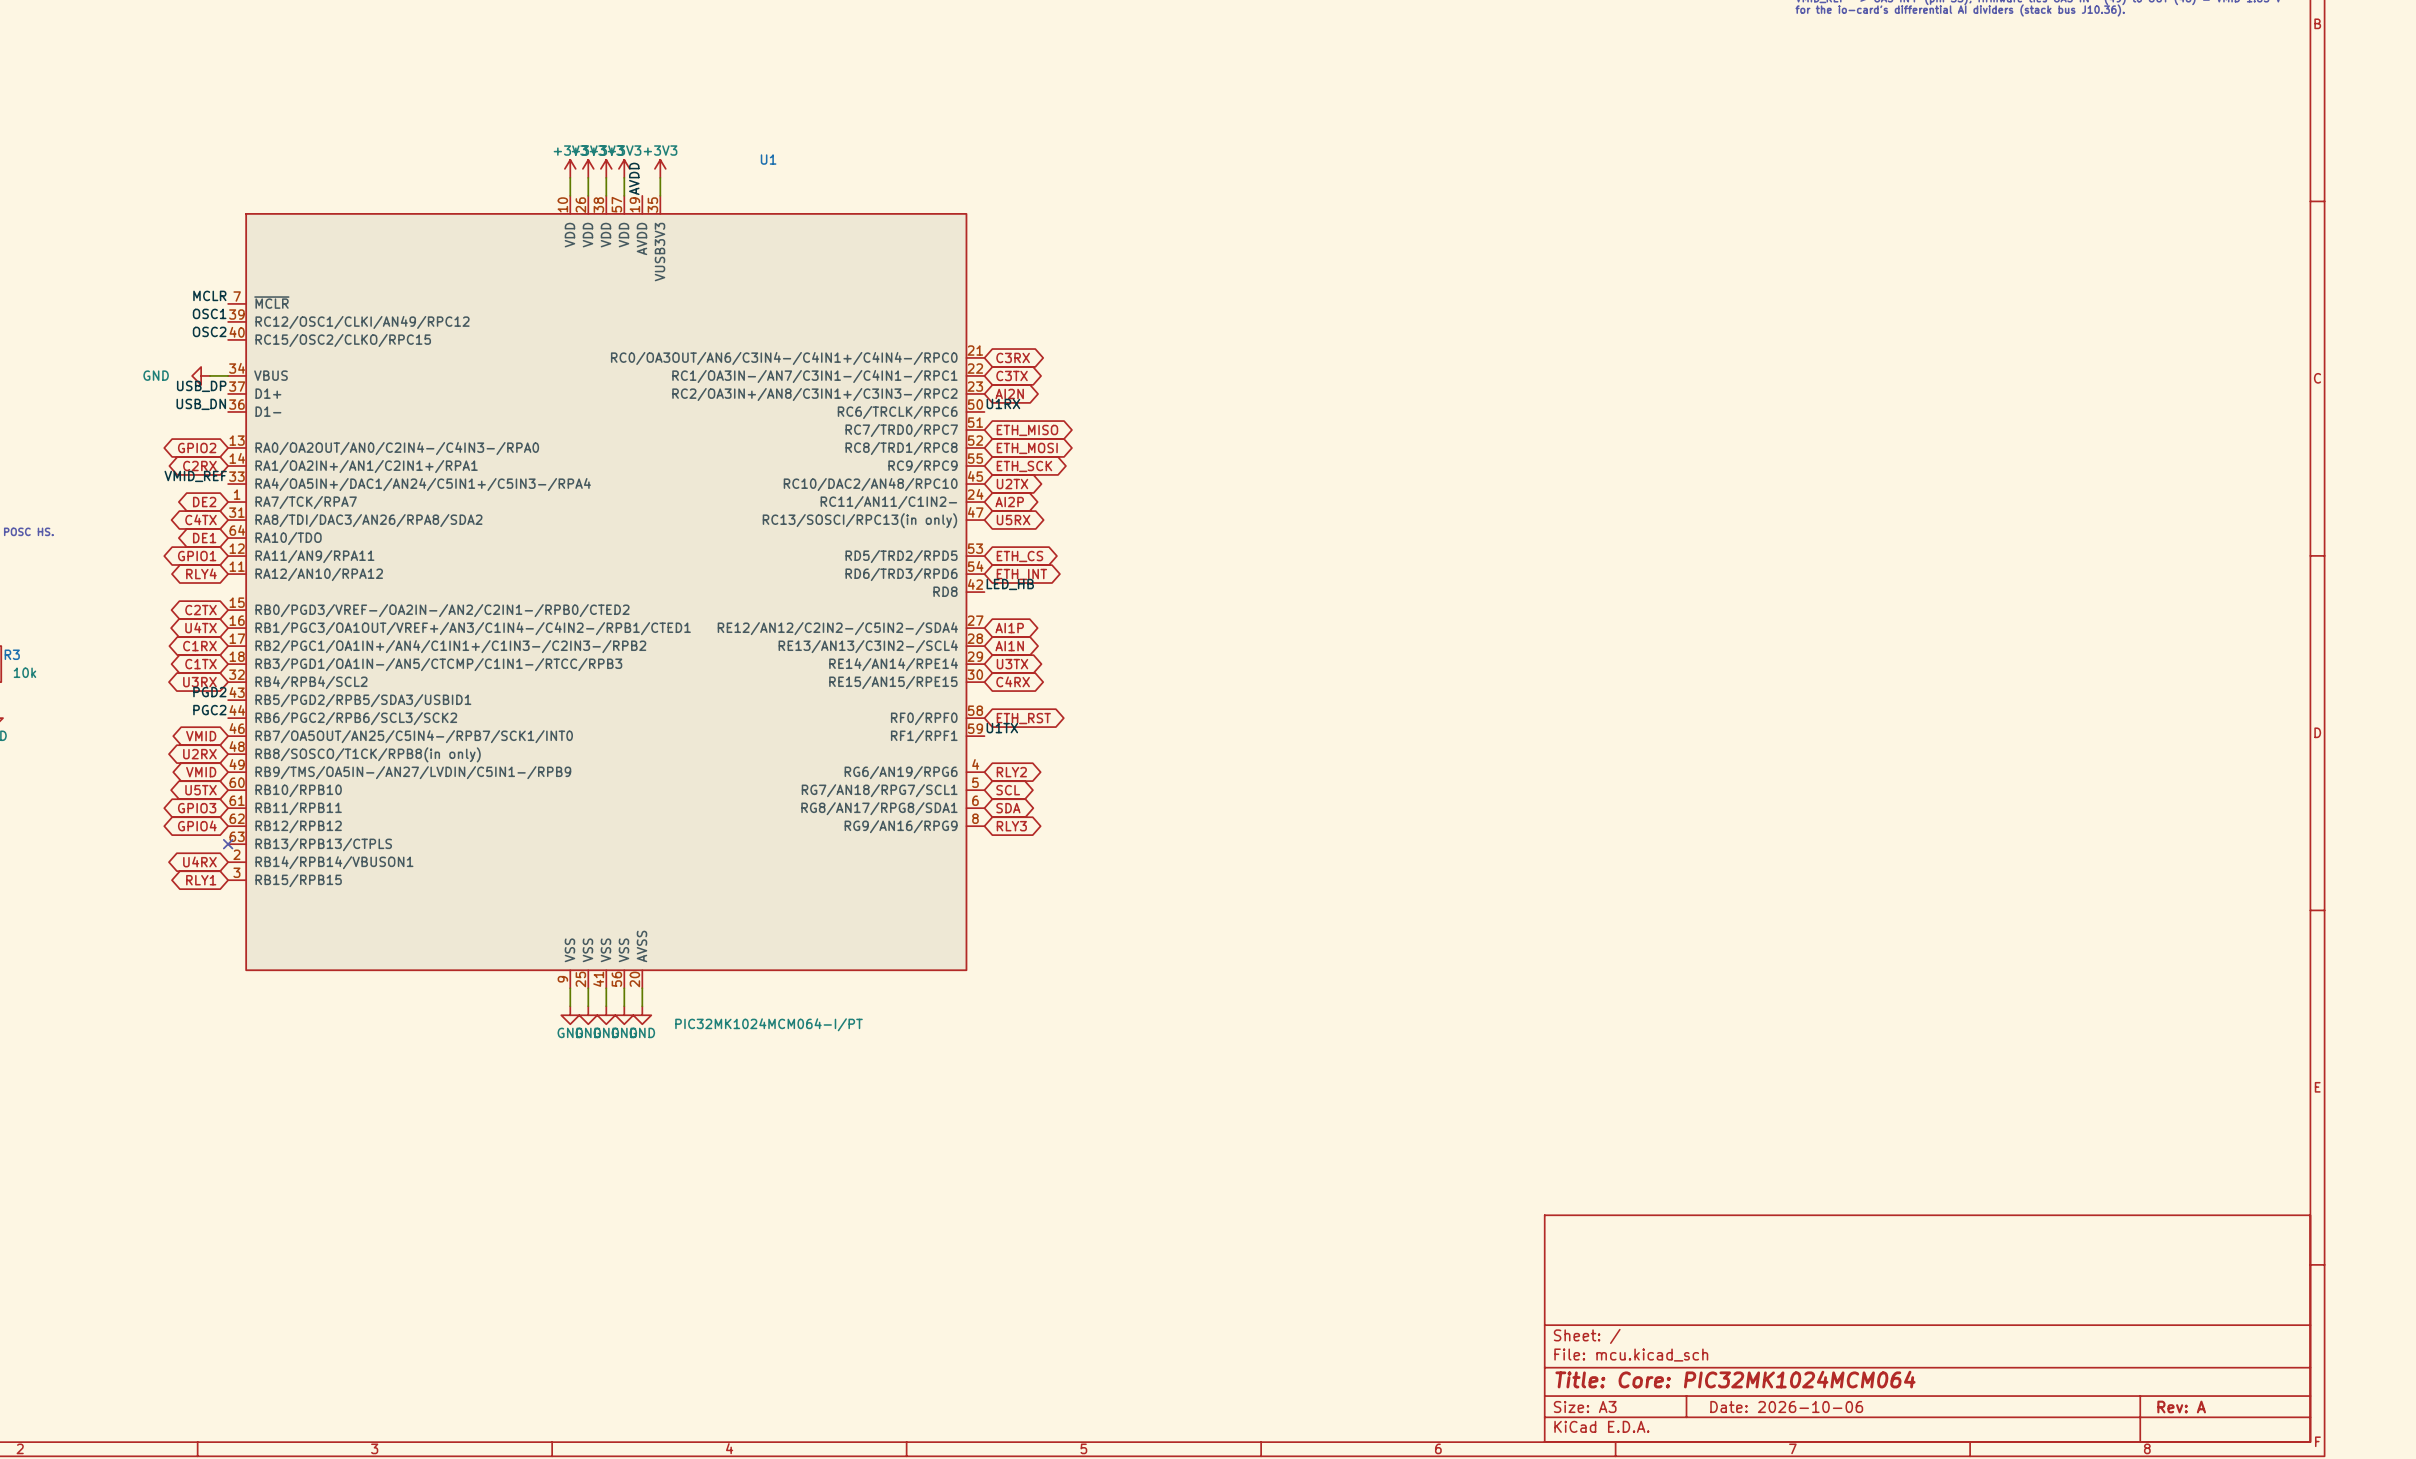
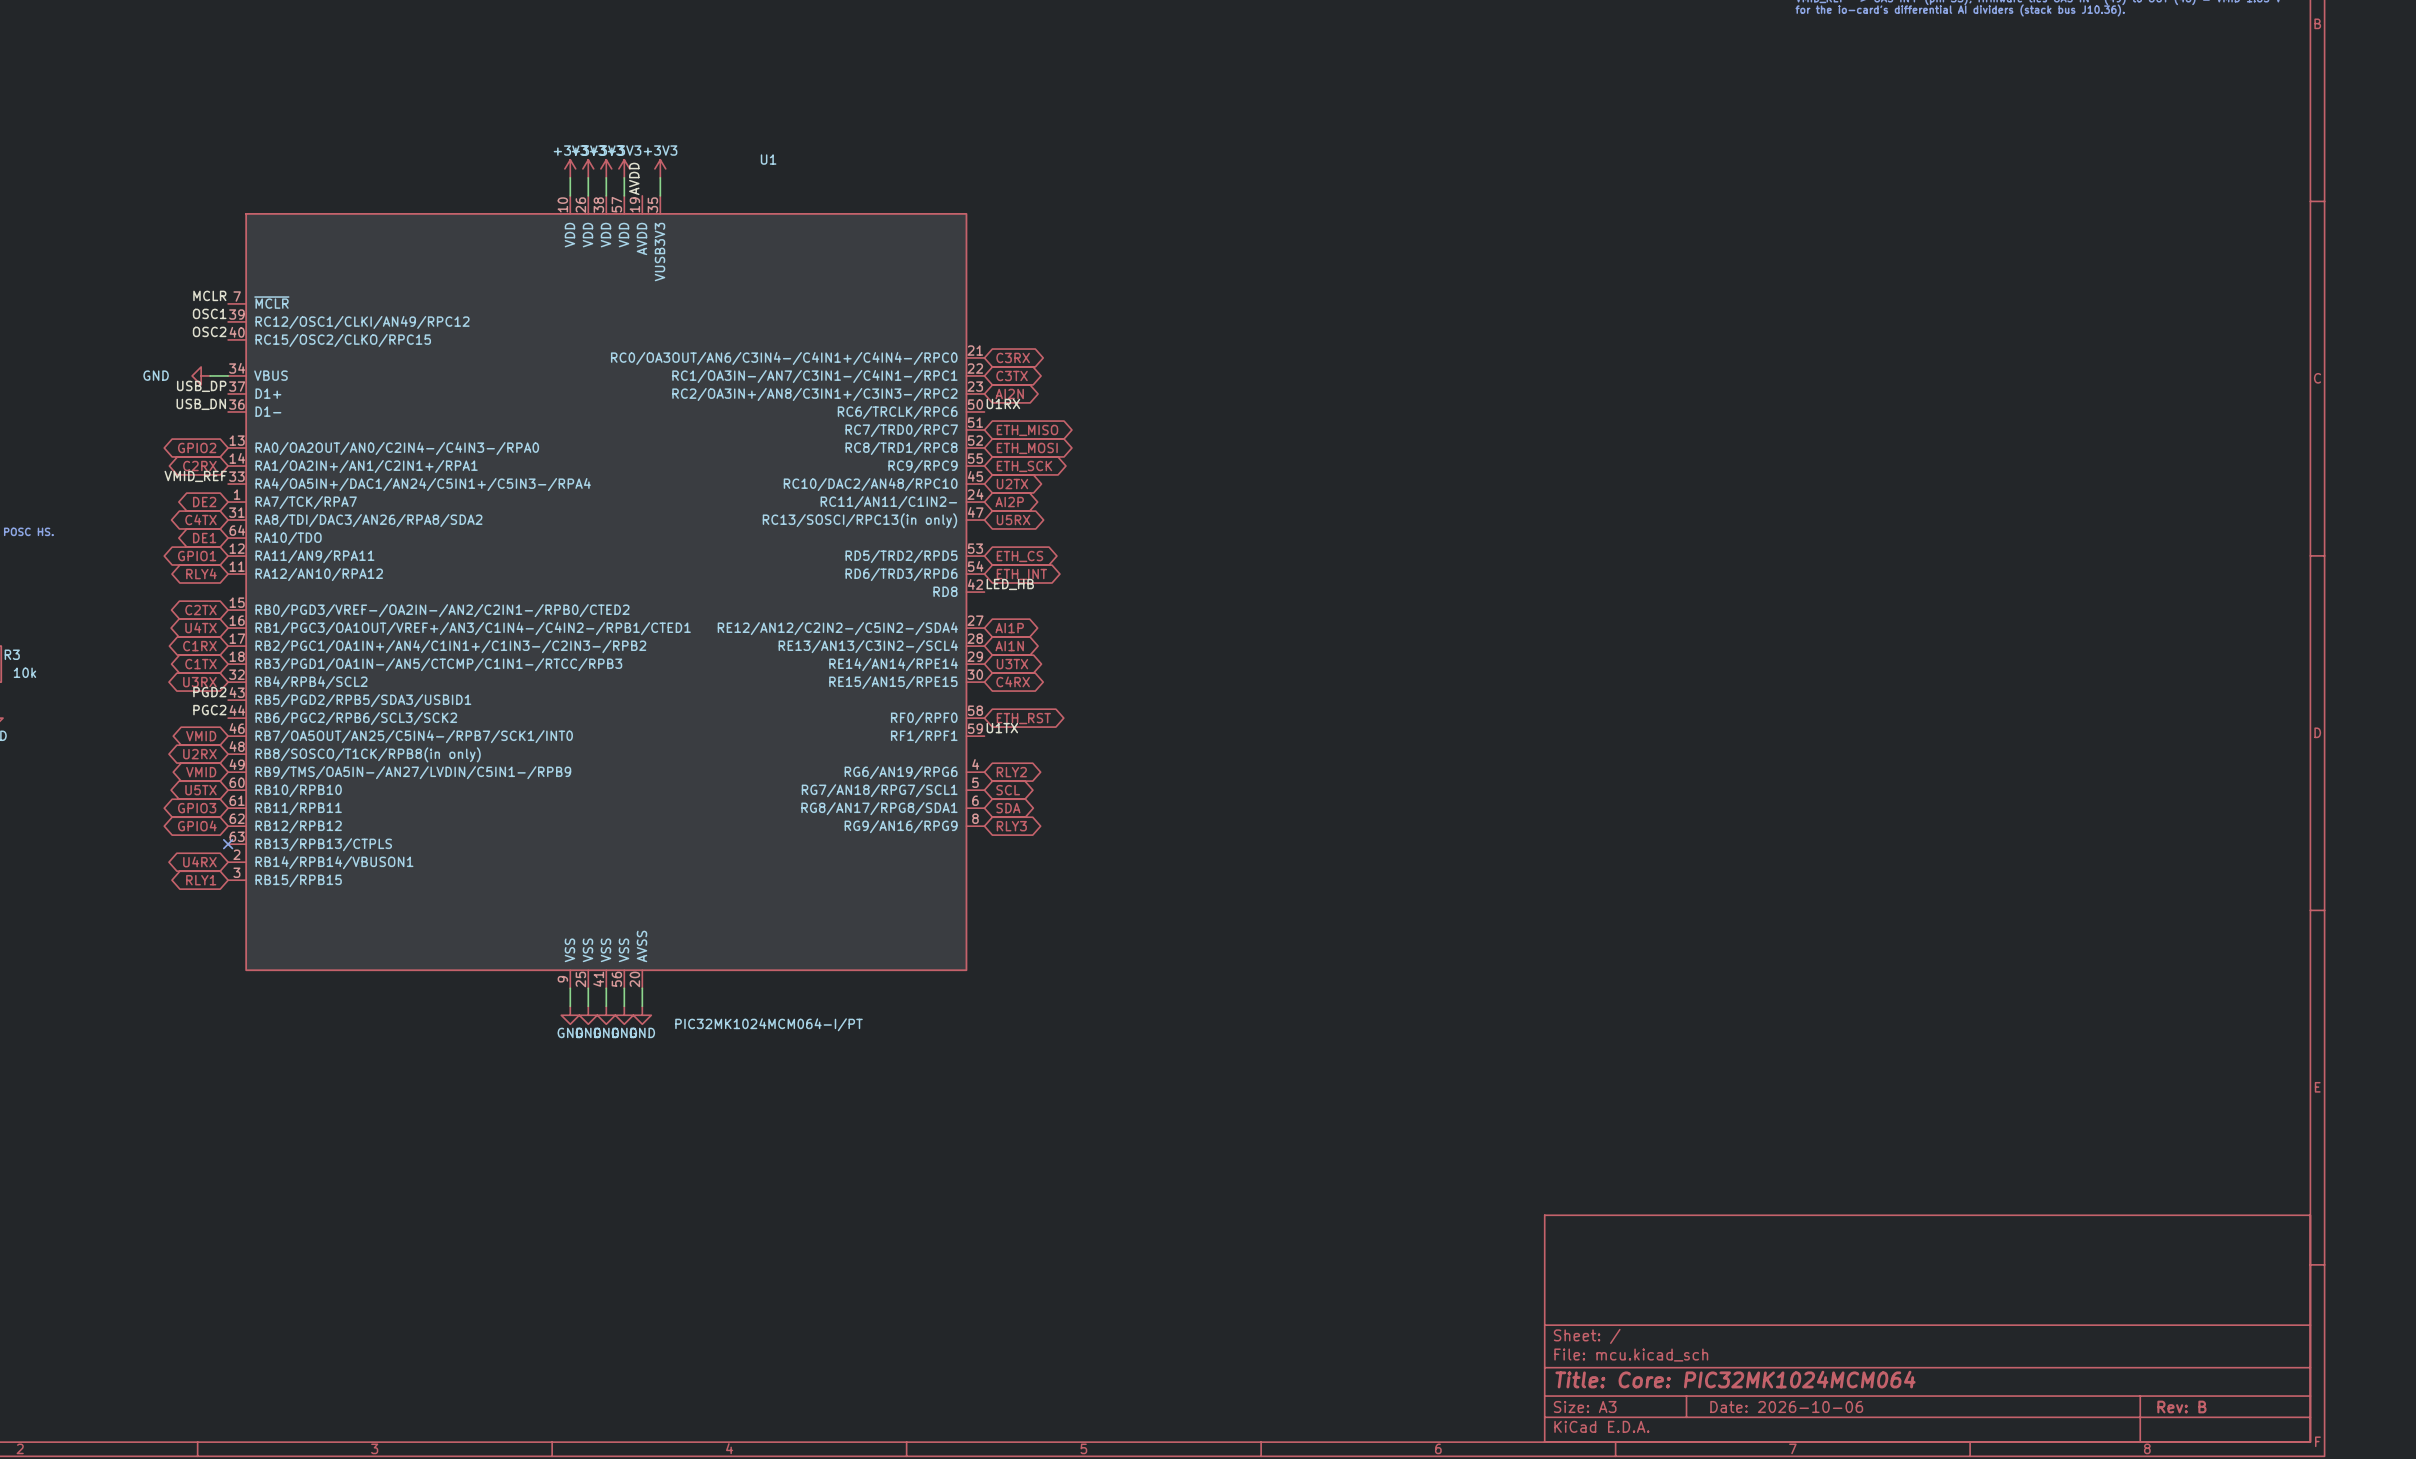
title block: Rev: A (2181, 1407) -> Rev: B (2181, 1407)

